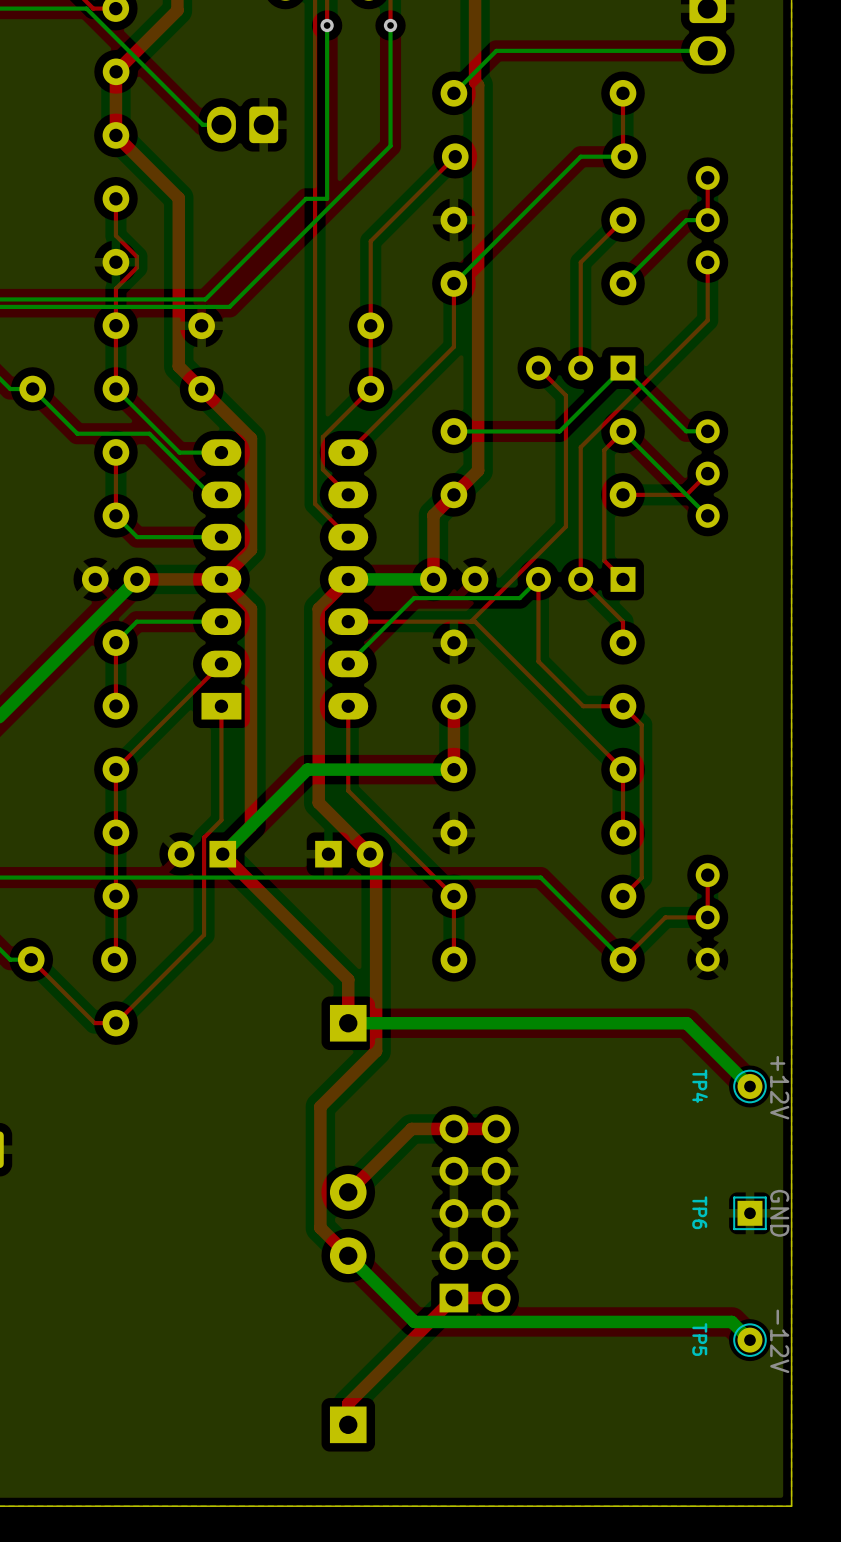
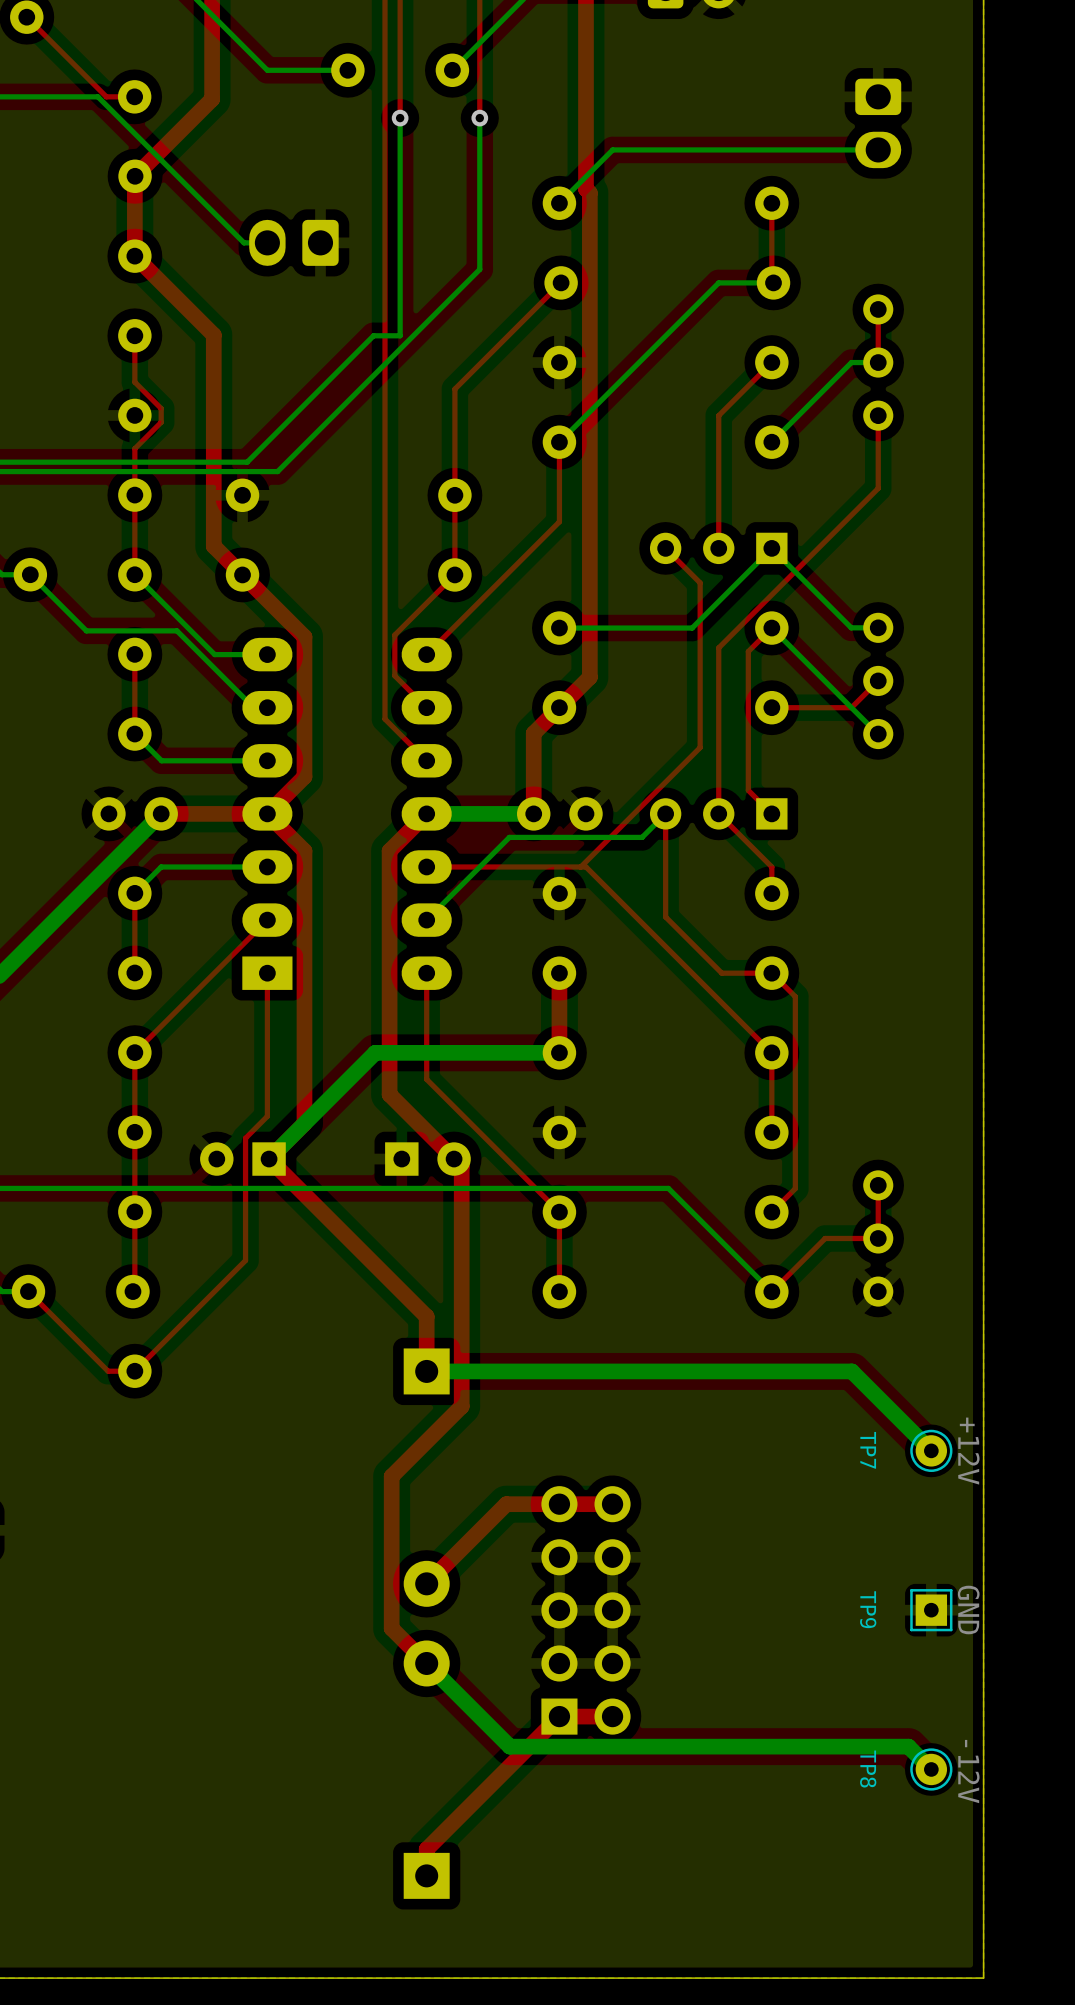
TP4 name: TP4 (700, 1086) -> TP7 (868, 1450)
TP6 name: TP6 (699, 1212) -> TP9 (868, 1609)
TP5 name: TP5 (699, 1339) -> TP8 (868, 1769)

